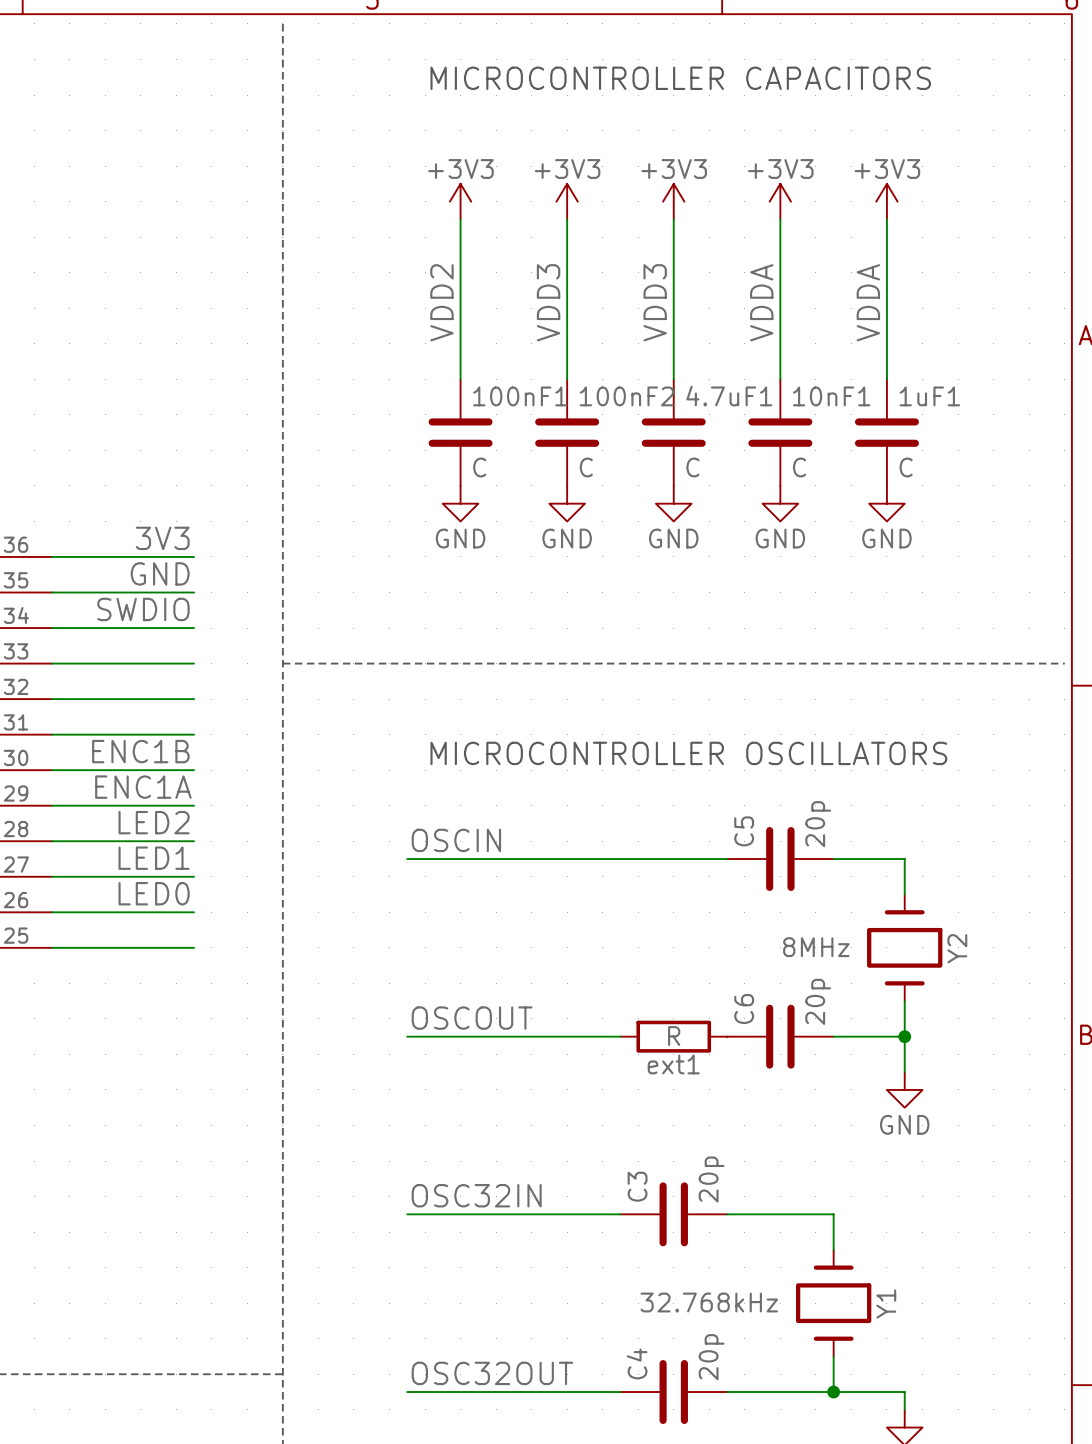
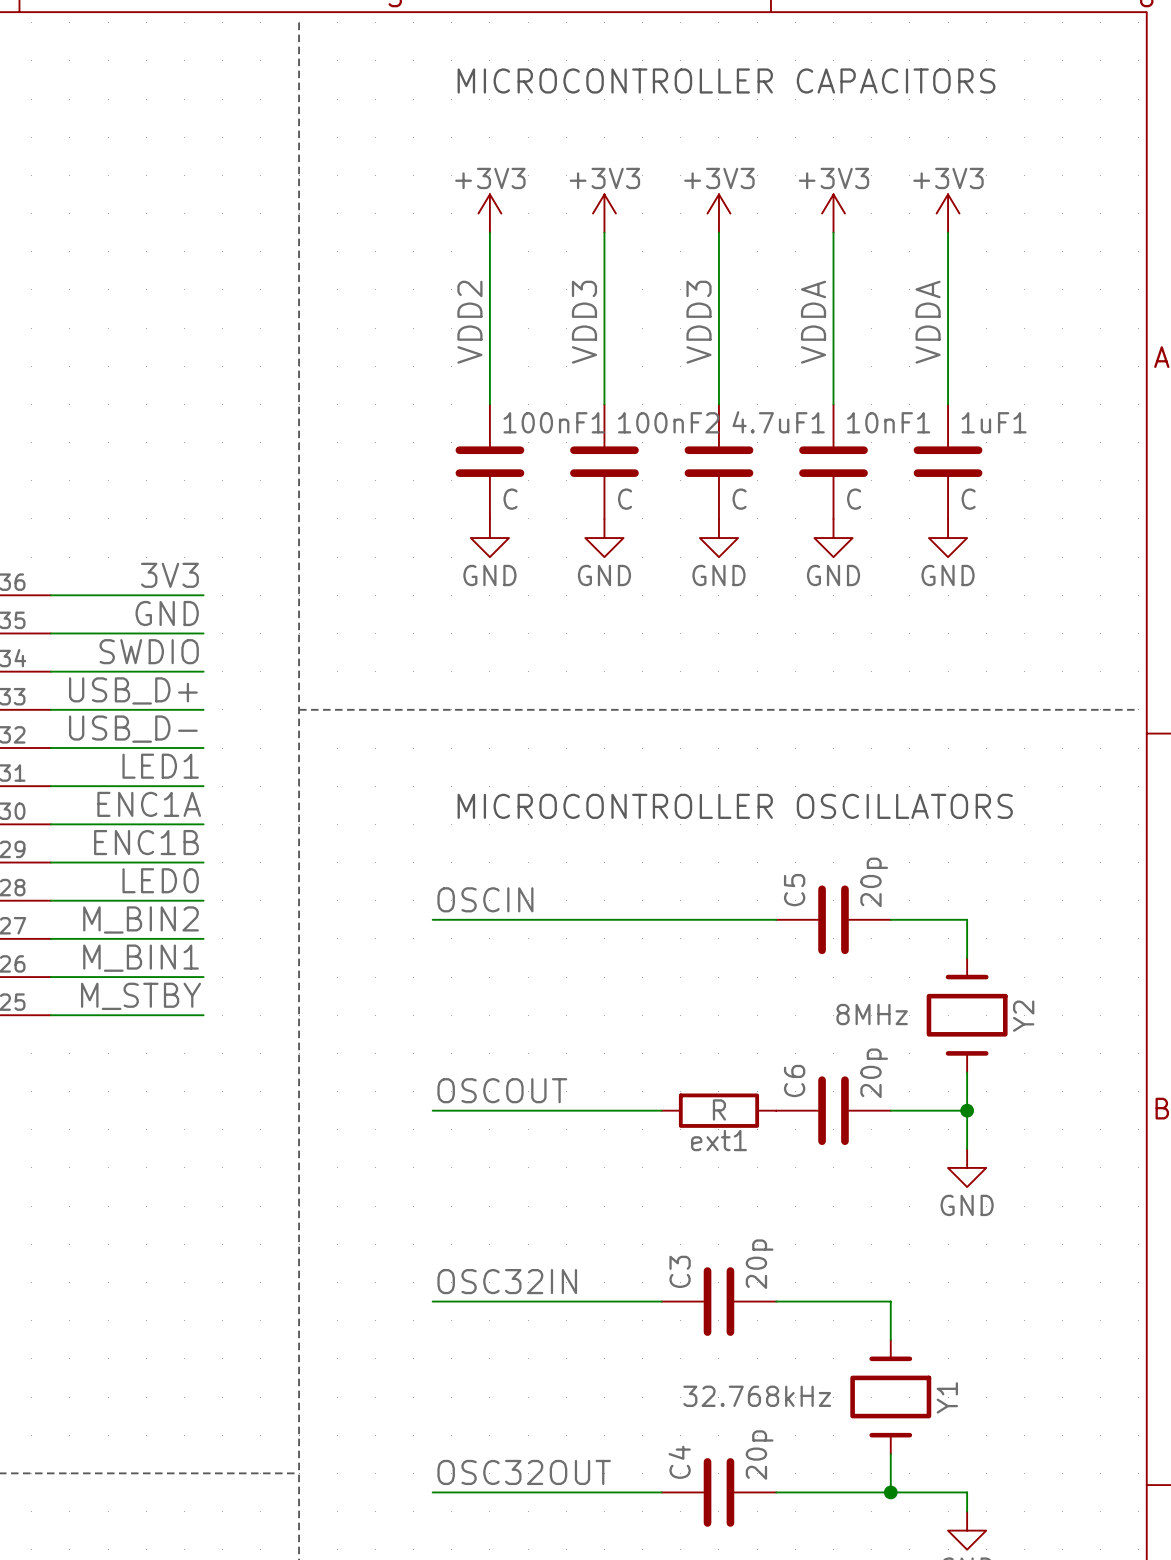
label: none -> USB_D+ (133, 690)
label: none -> USB_D- (133, 729)
label: none -> LED1 (160, 766)
label: ENC1B (140, 751) -> ENC1A (149, 804)
label: ENC1A (143, 787) -> ENC1B (146, 842)
label: LED2 (154, 822) -> LED0 (160, 880)
label: LED1 (154, 858) -> M_BIN2 (141, 919)
label: LED0 (154, 893) -> M_BIN1 (141, 958)
label: none -> M_STBY (141, 996)

